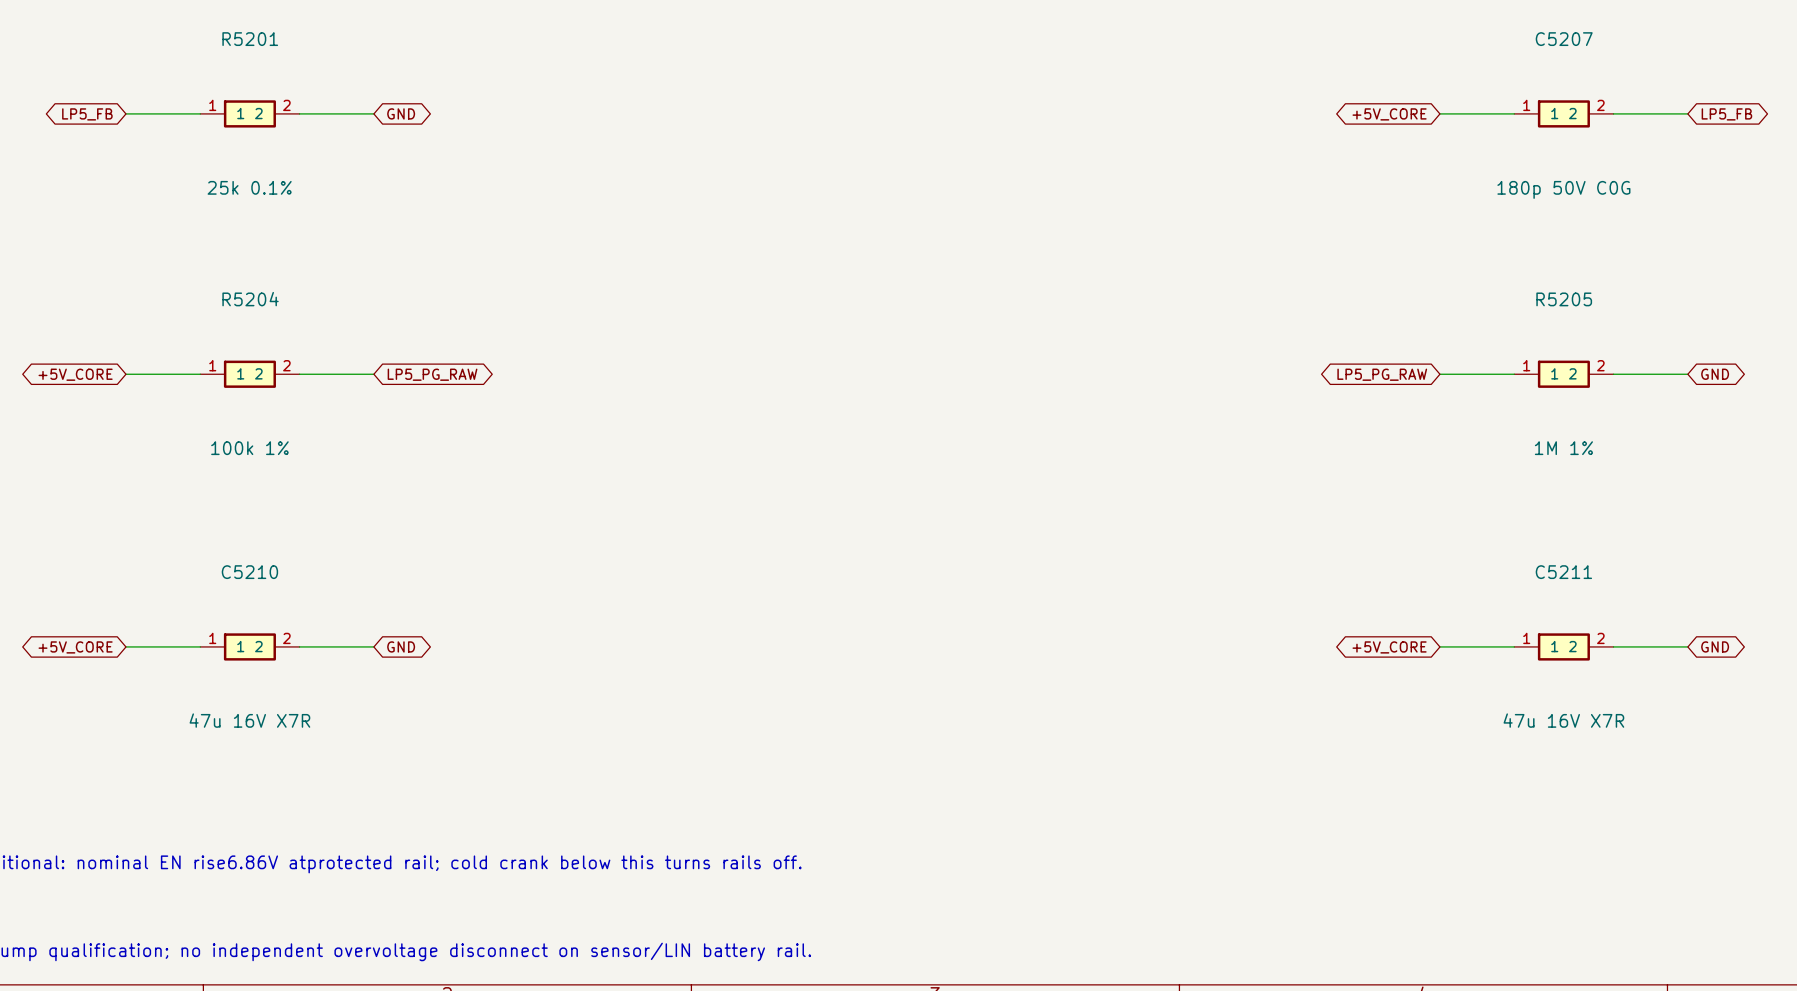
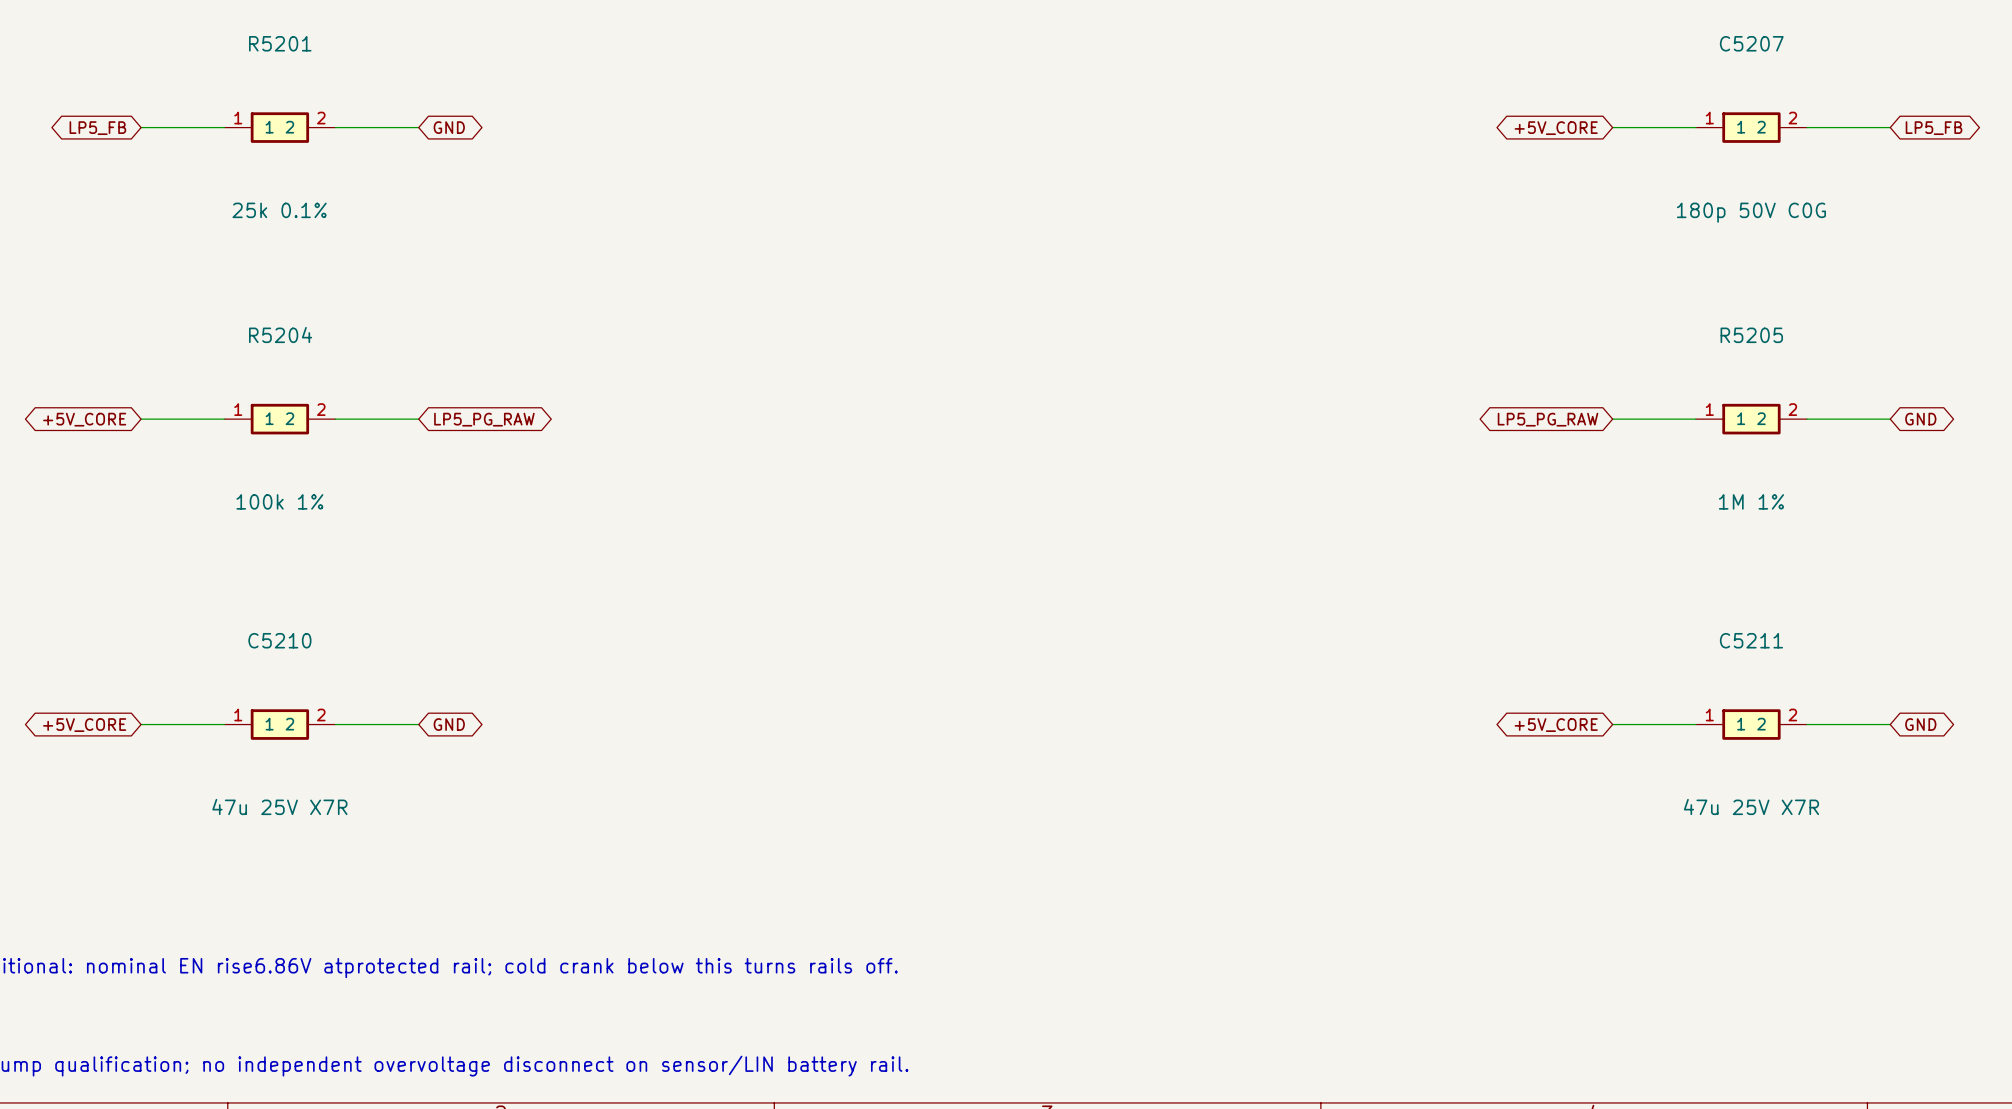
C5210 value: 47u 16V X7R (249, 720) -> 47u 25V X7R (279, 806)
C5211 value: 47u 16V X7R (1563, 720) -> 47u 25V X7R (1751, 806)

